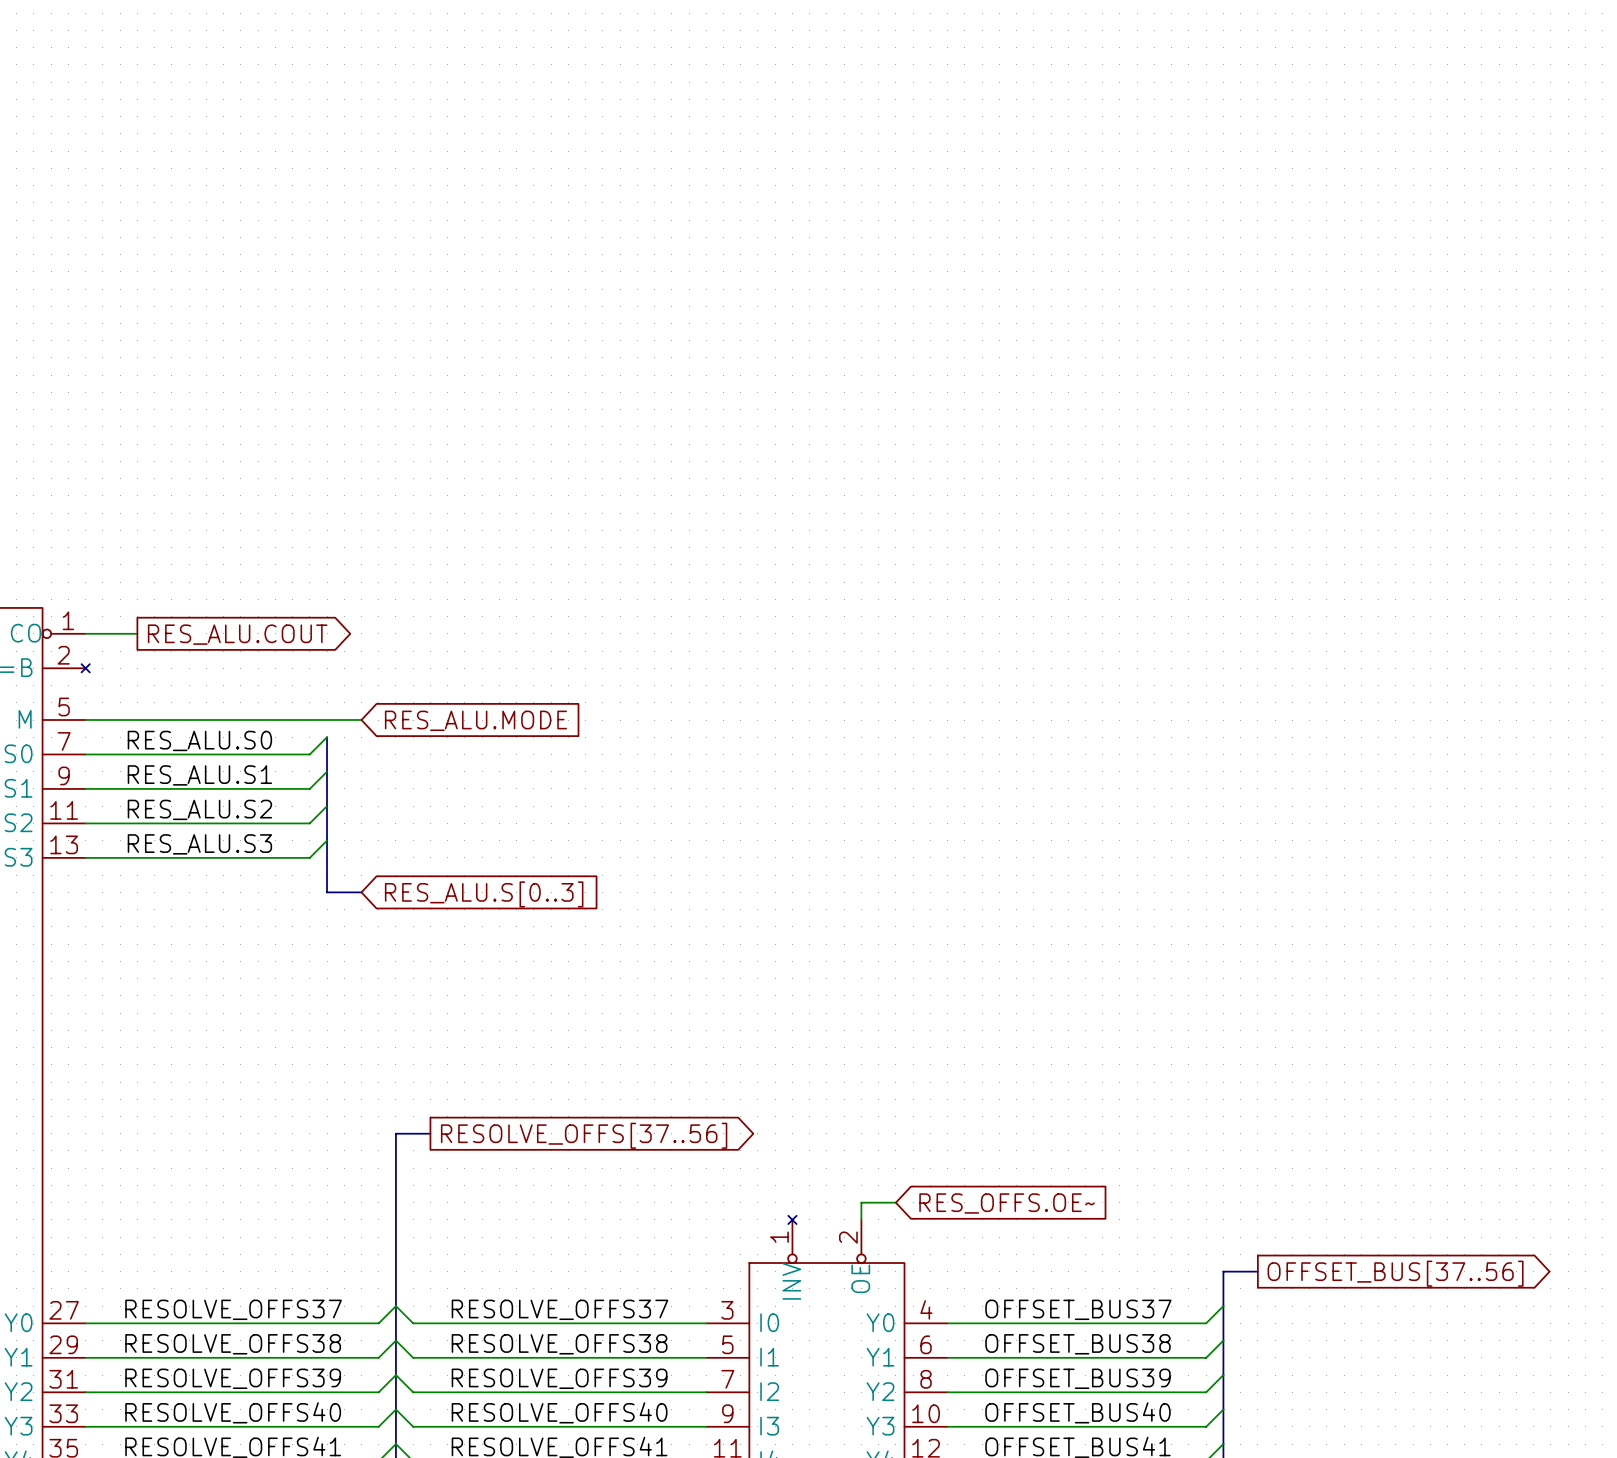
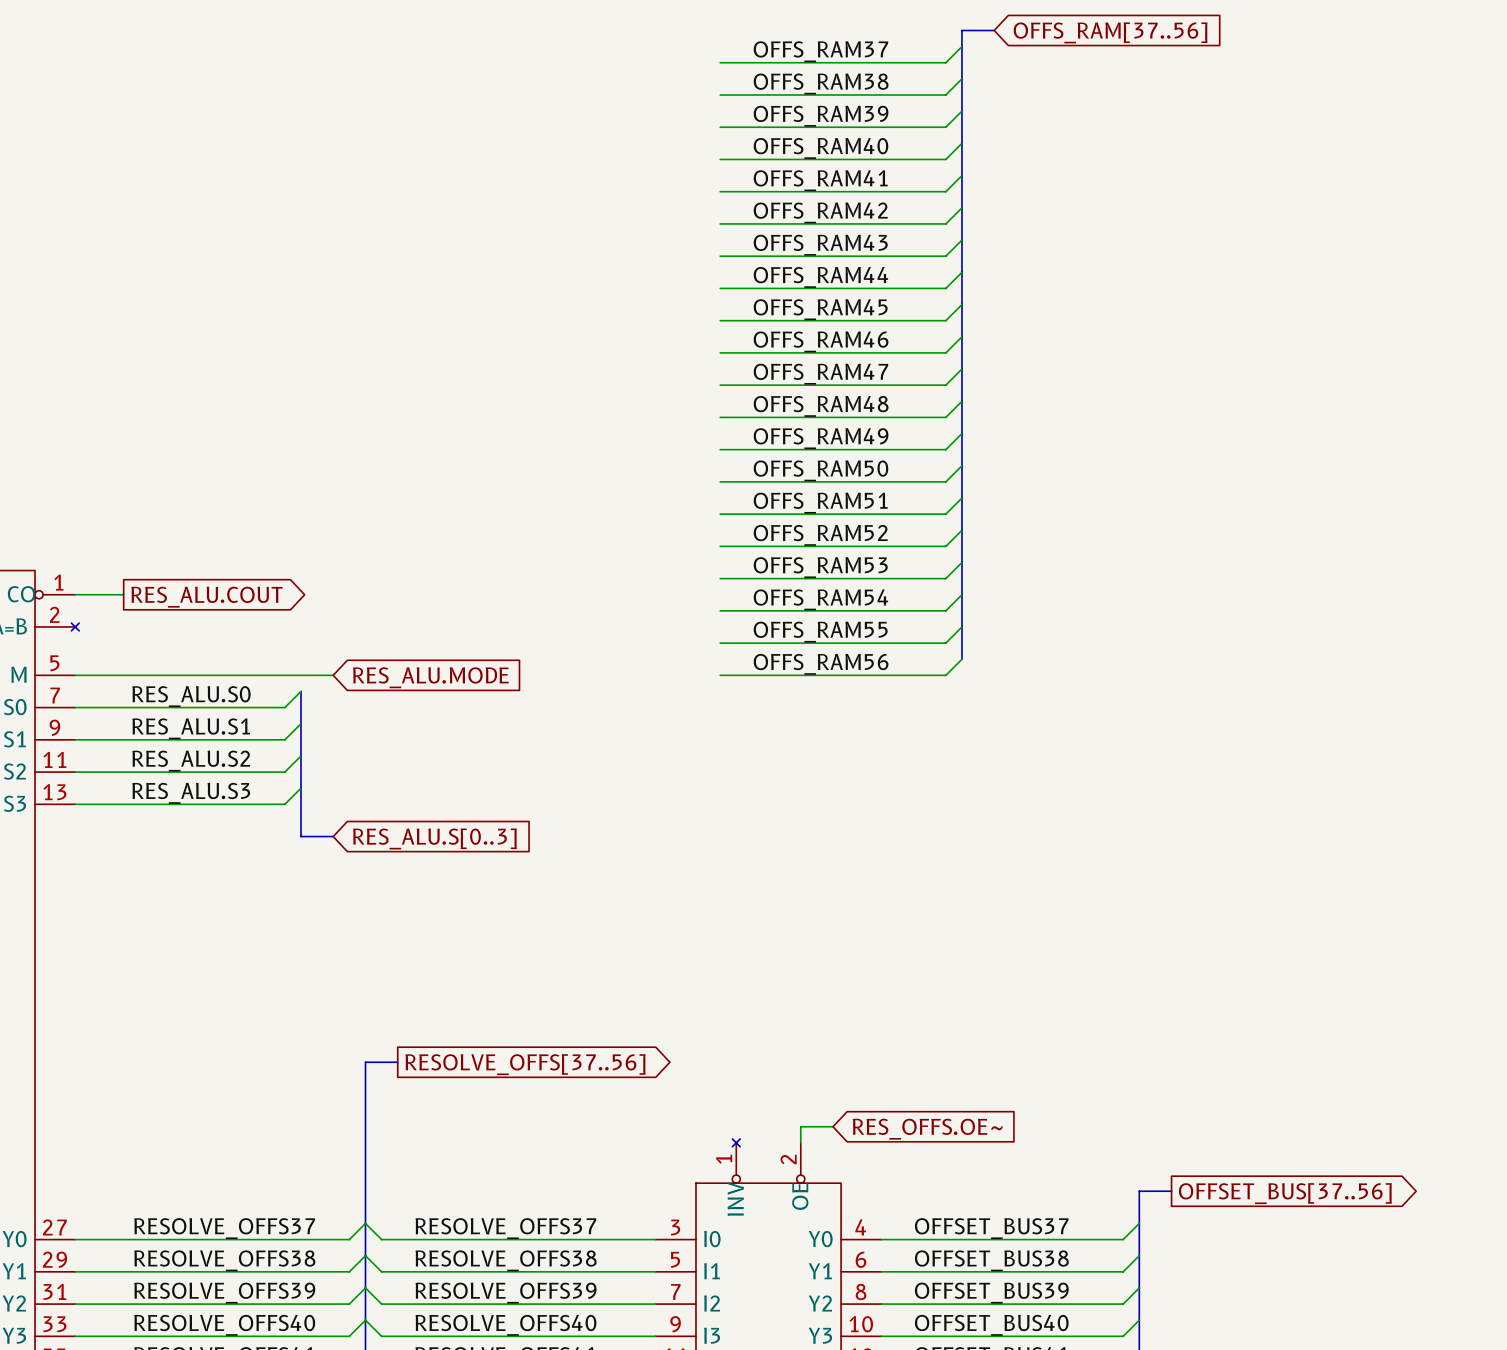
bus: none -> (994, 30) (961, 30) (961, 659)
global label: none -> OFFS_RAM[37..56] (1110, 32)
wire: none -> (961, 46) (945, 62) (720, 62)
label: none -> OFFS_RAM37 (820, 51)
wire: none -> (961, 78) (945, 94) (720, 94)
label: none -> OFFS_RAM38 (821, 83)
wire: none -> (961, 111) (945, 127) (720, 127)
label: none -> OFFS_RAM39 (821, 116)
wire: none -> (961, 143) (945, 159) (720, 159)
label: none -> OFFS_RAM40 (820, 148)
wire: none -> (961, 175) (945, 191) (720, 191)
label: none -> OFFS_RAM41 (820, 180)
wire: none -> (961, 207) (945, 223) (720, 223)
label: none -> OFFS_RAM42 (820, 212)
wire: none -> (961, 240) (945, 256) (720, 256)
label: none -> OFFS_RAM43 (820, 245)
wire: none -> (961, 272) (945, 288) (720, 288)
label: none -> OFFS_RAM44 (820, 277)
wire: none -> (961, 304) (945, 320) (720, 320)
label: none -> OFFS_RAM45 (820, 309)
wire: none -> (961, 336) (945, 352) (720, 352)
label: none -> OFFS_RAM46 (821, 341)
wire: none -> (961, 369) (945, 385) (720, 385)
label: none -> OFFS_RAM47 (820, 374)
wire: none -> (961, 401) (945, 417) (720, 417)
label: none -> OFFS_RAM48 (821, 406)
wire: none -> (961, 433) (945, 449) (720, 449)
label: none -> OFFS_RAM49 (821, 438)
wire: none -> (961, 465) (945, 481) (720, 481)
label: none -> OFFS_RAM50 (820, 470)
wire: none -> (961, 498) (945, 514) (720, 514)
label: none -> OFFS_RAM51 (820, 503)
wire: none -> (961, 530) (945, 546) (720, 546)
label: none -> OFFS_RAM52 (820, 535)
wire: none -> (961, 562) (945, 578) (720, 578)
label: none -> OFFS_RAM53 (820, 567)
wire: none -> (961, 594) (945, 610) (720, 610)
label: none -> OFFS_RAM54 (820, 599)
wire: none -> (961, 626) (945, 643) (720, 643)
label: none -> OFFS_RAM55 (820, 632)
wire: none -> (961, 659) (945, 675) (720, 675)
label: none -> OFFS_RAM56 (821, 664)

